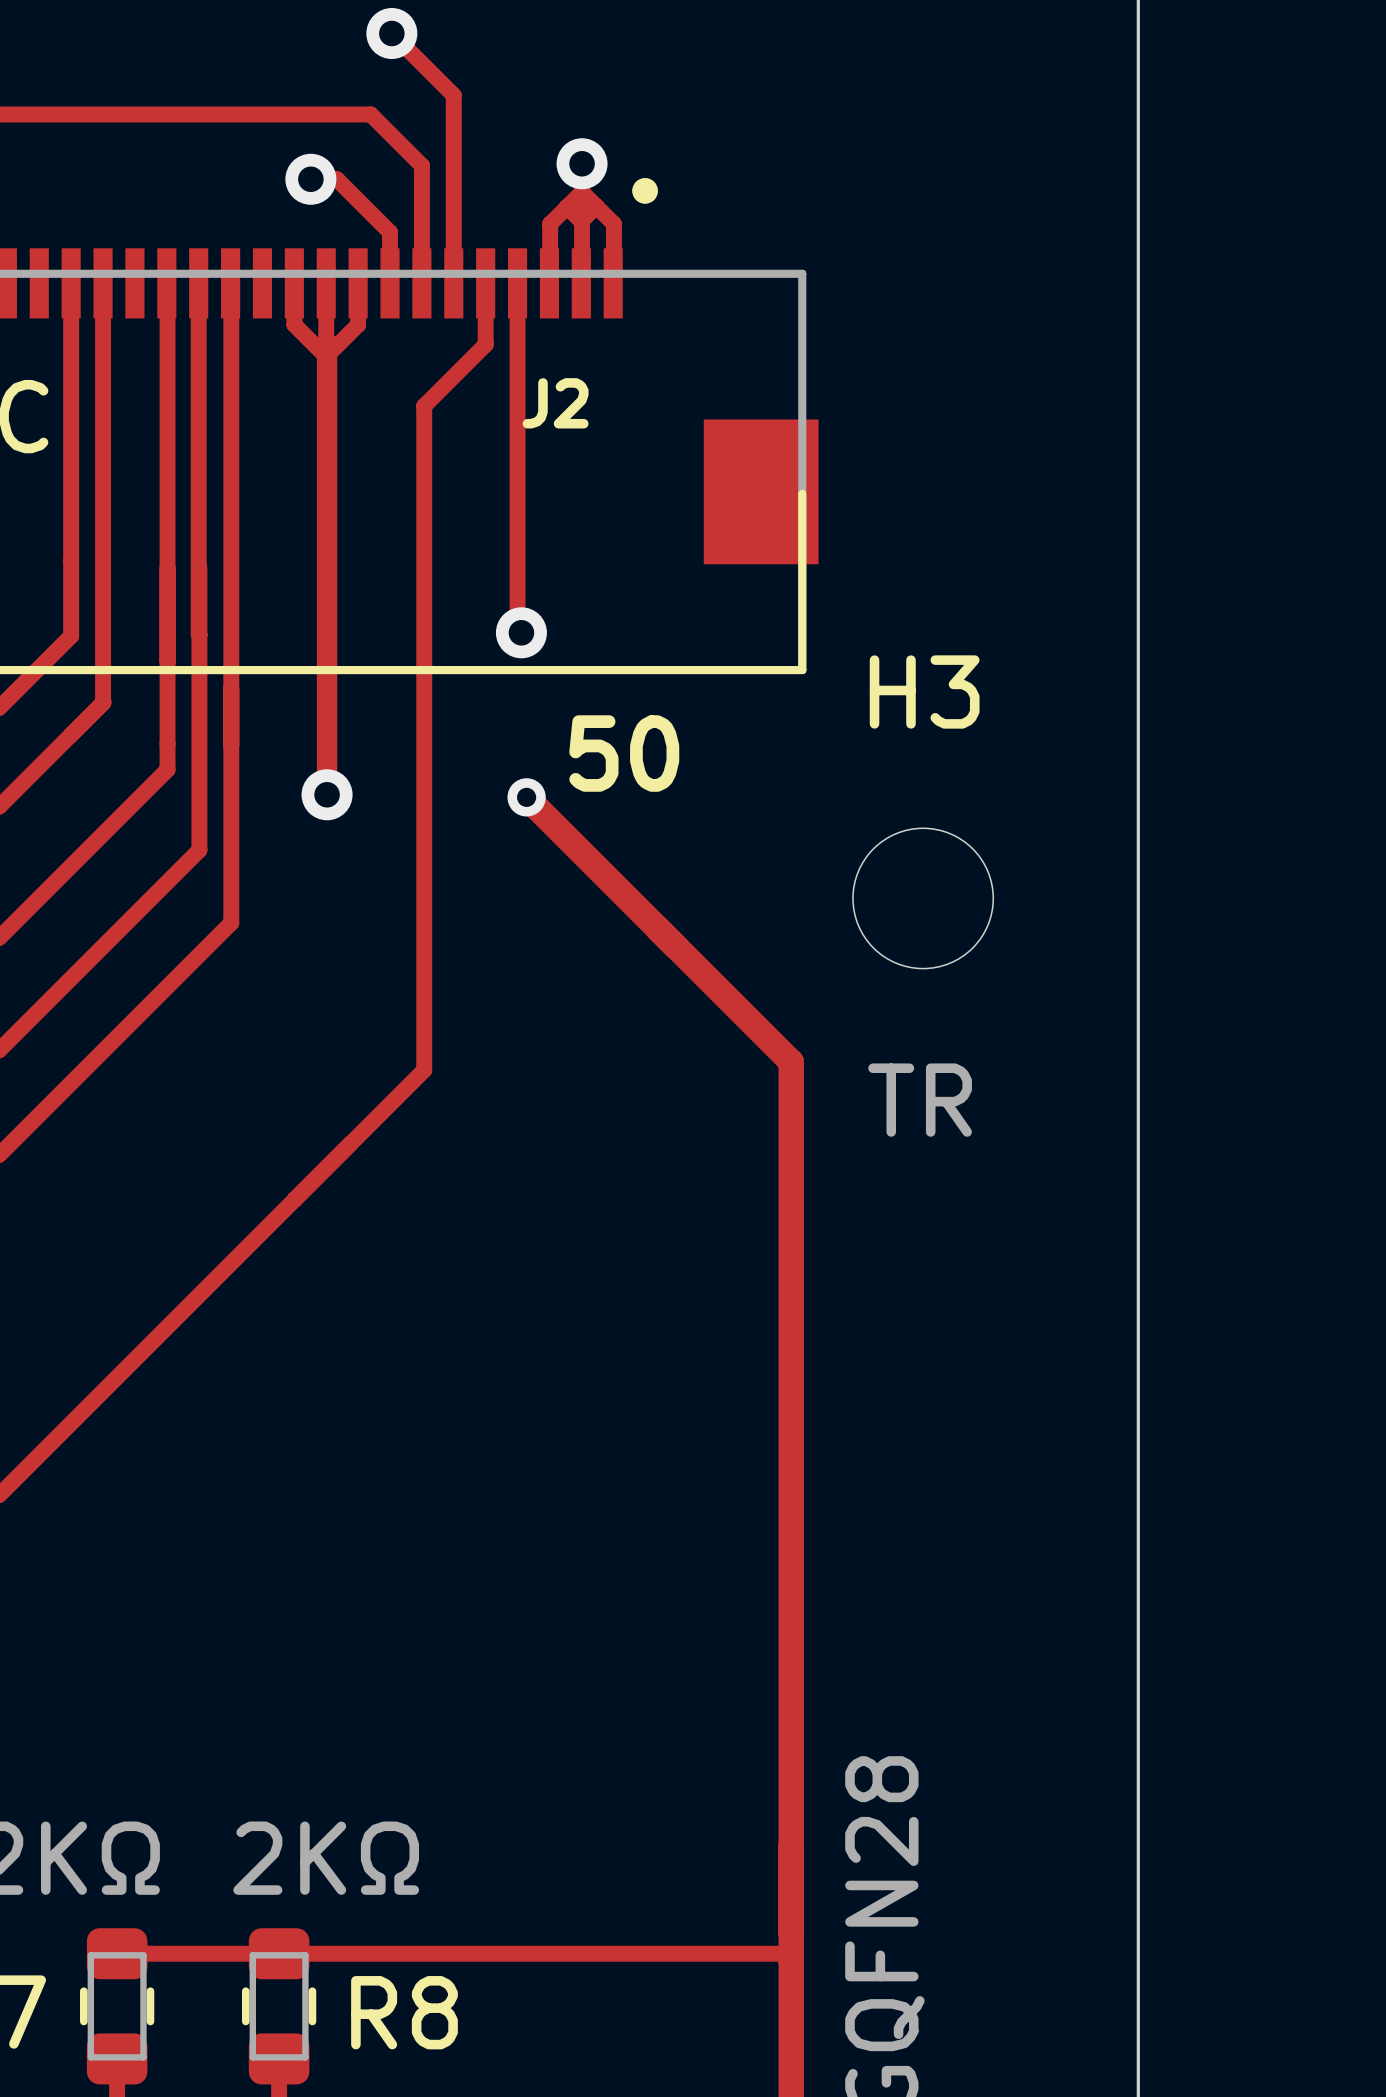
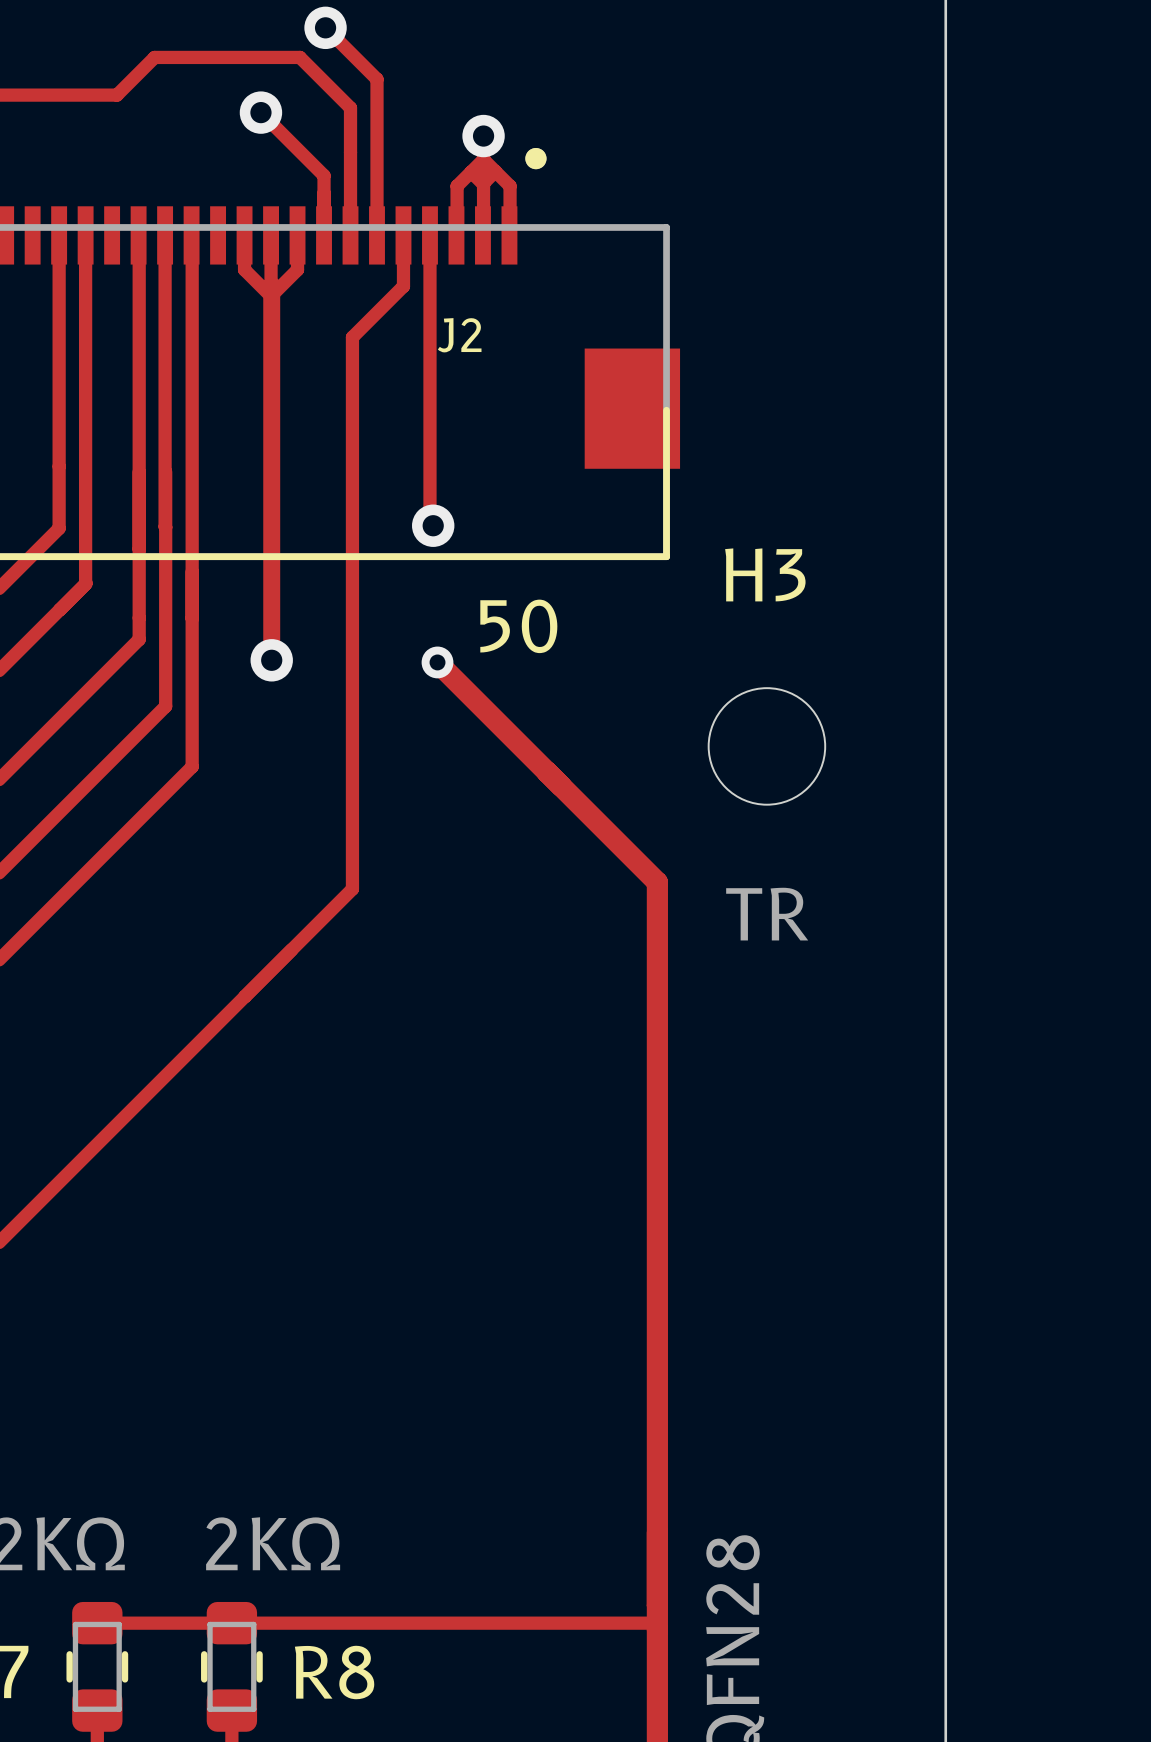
track: (140, 114) (370, 114) (421, 165) -> (116, 95) (154, 57) (299, 57) (350, 107) (350, 137)
track: (310, 179) (336, 179) (390, 232) -> (260, 112) (324, 175) (324, 193)
via position: (310, 179) -> (260, 112)

